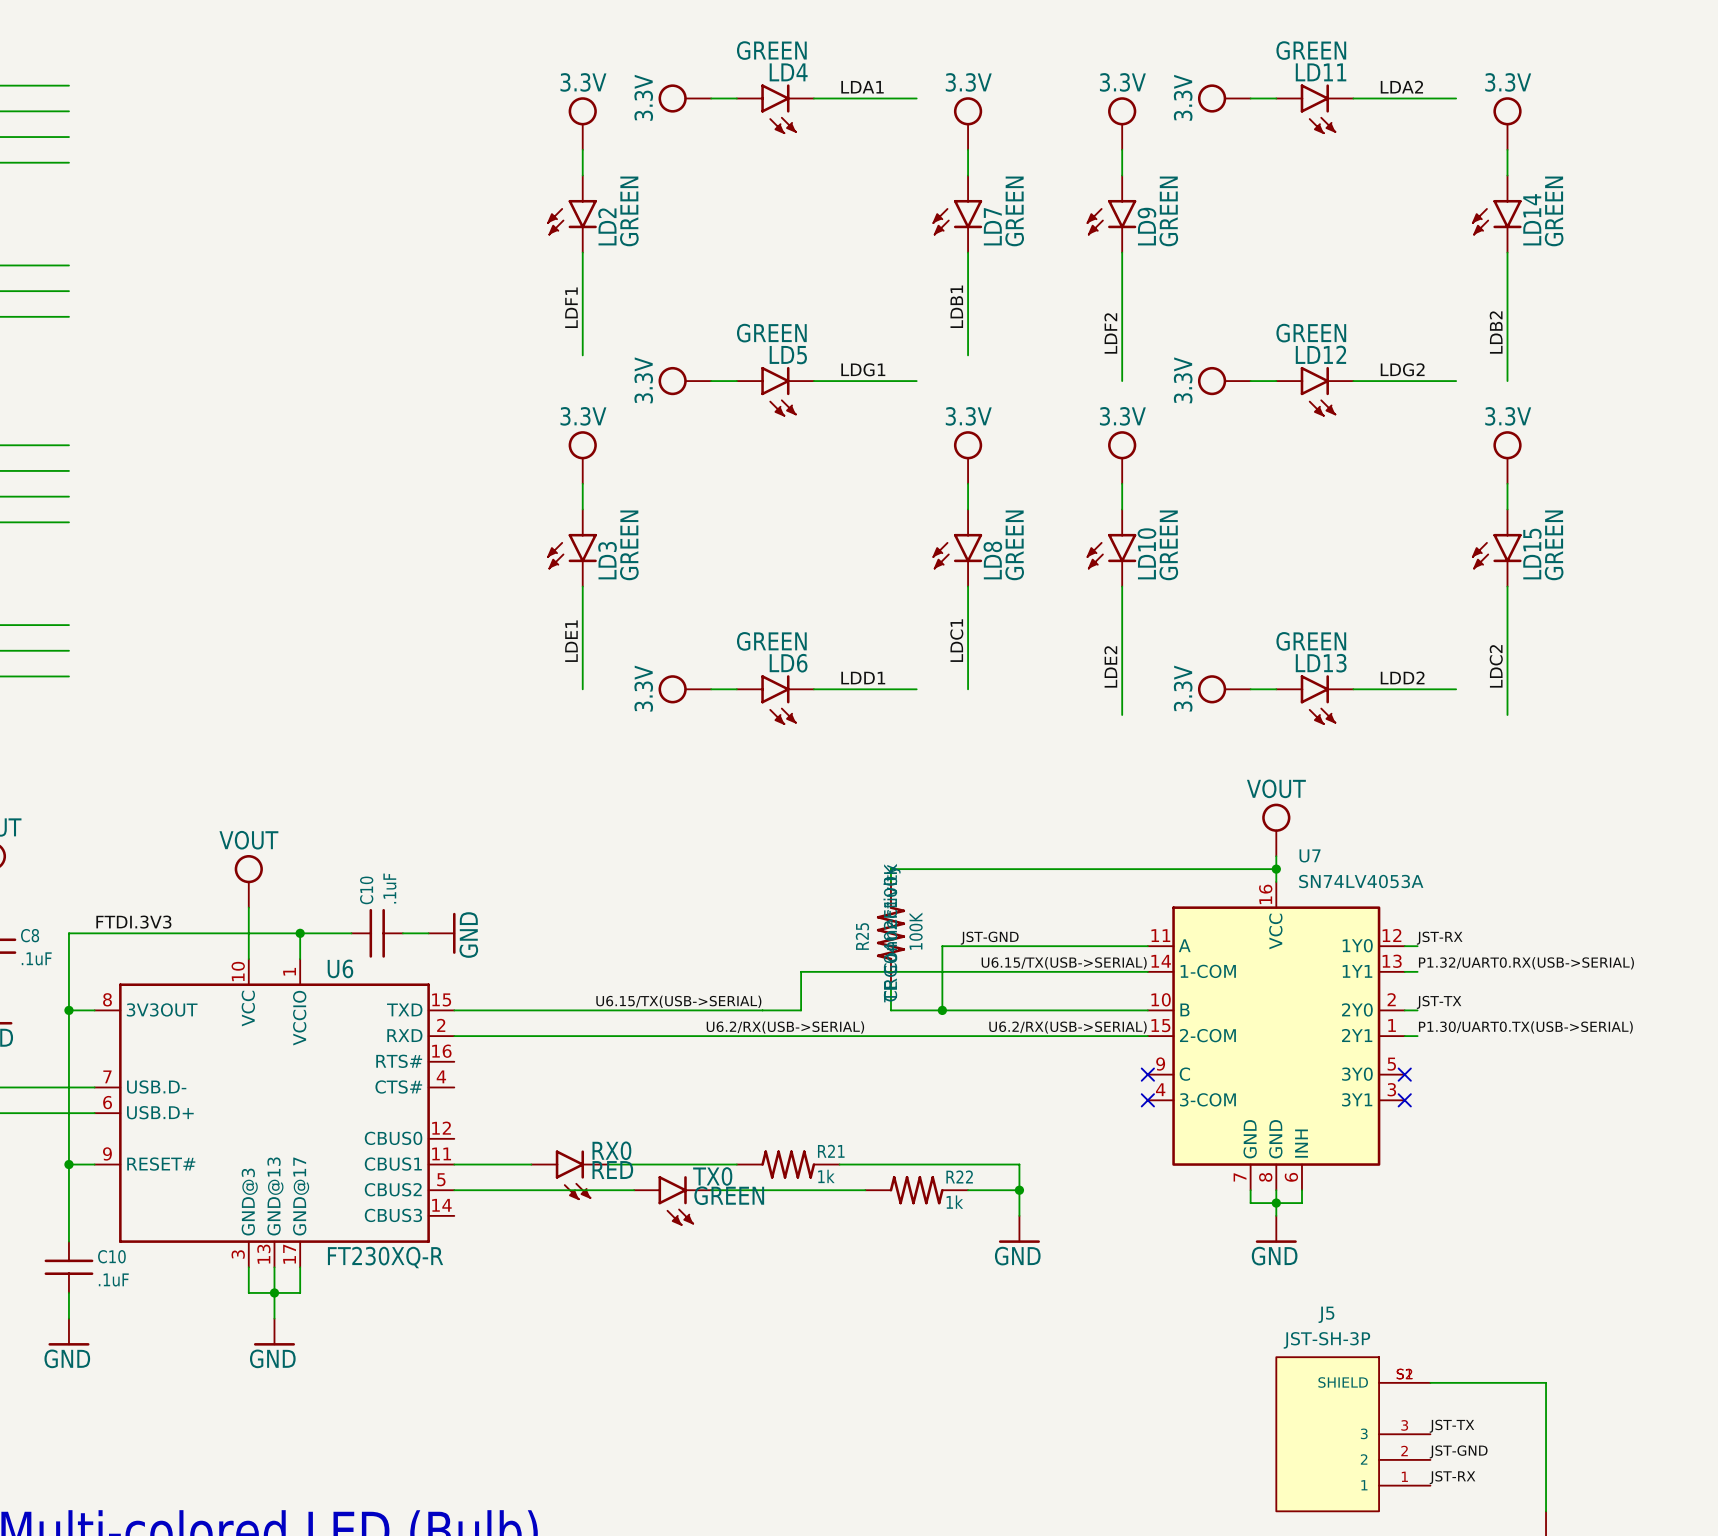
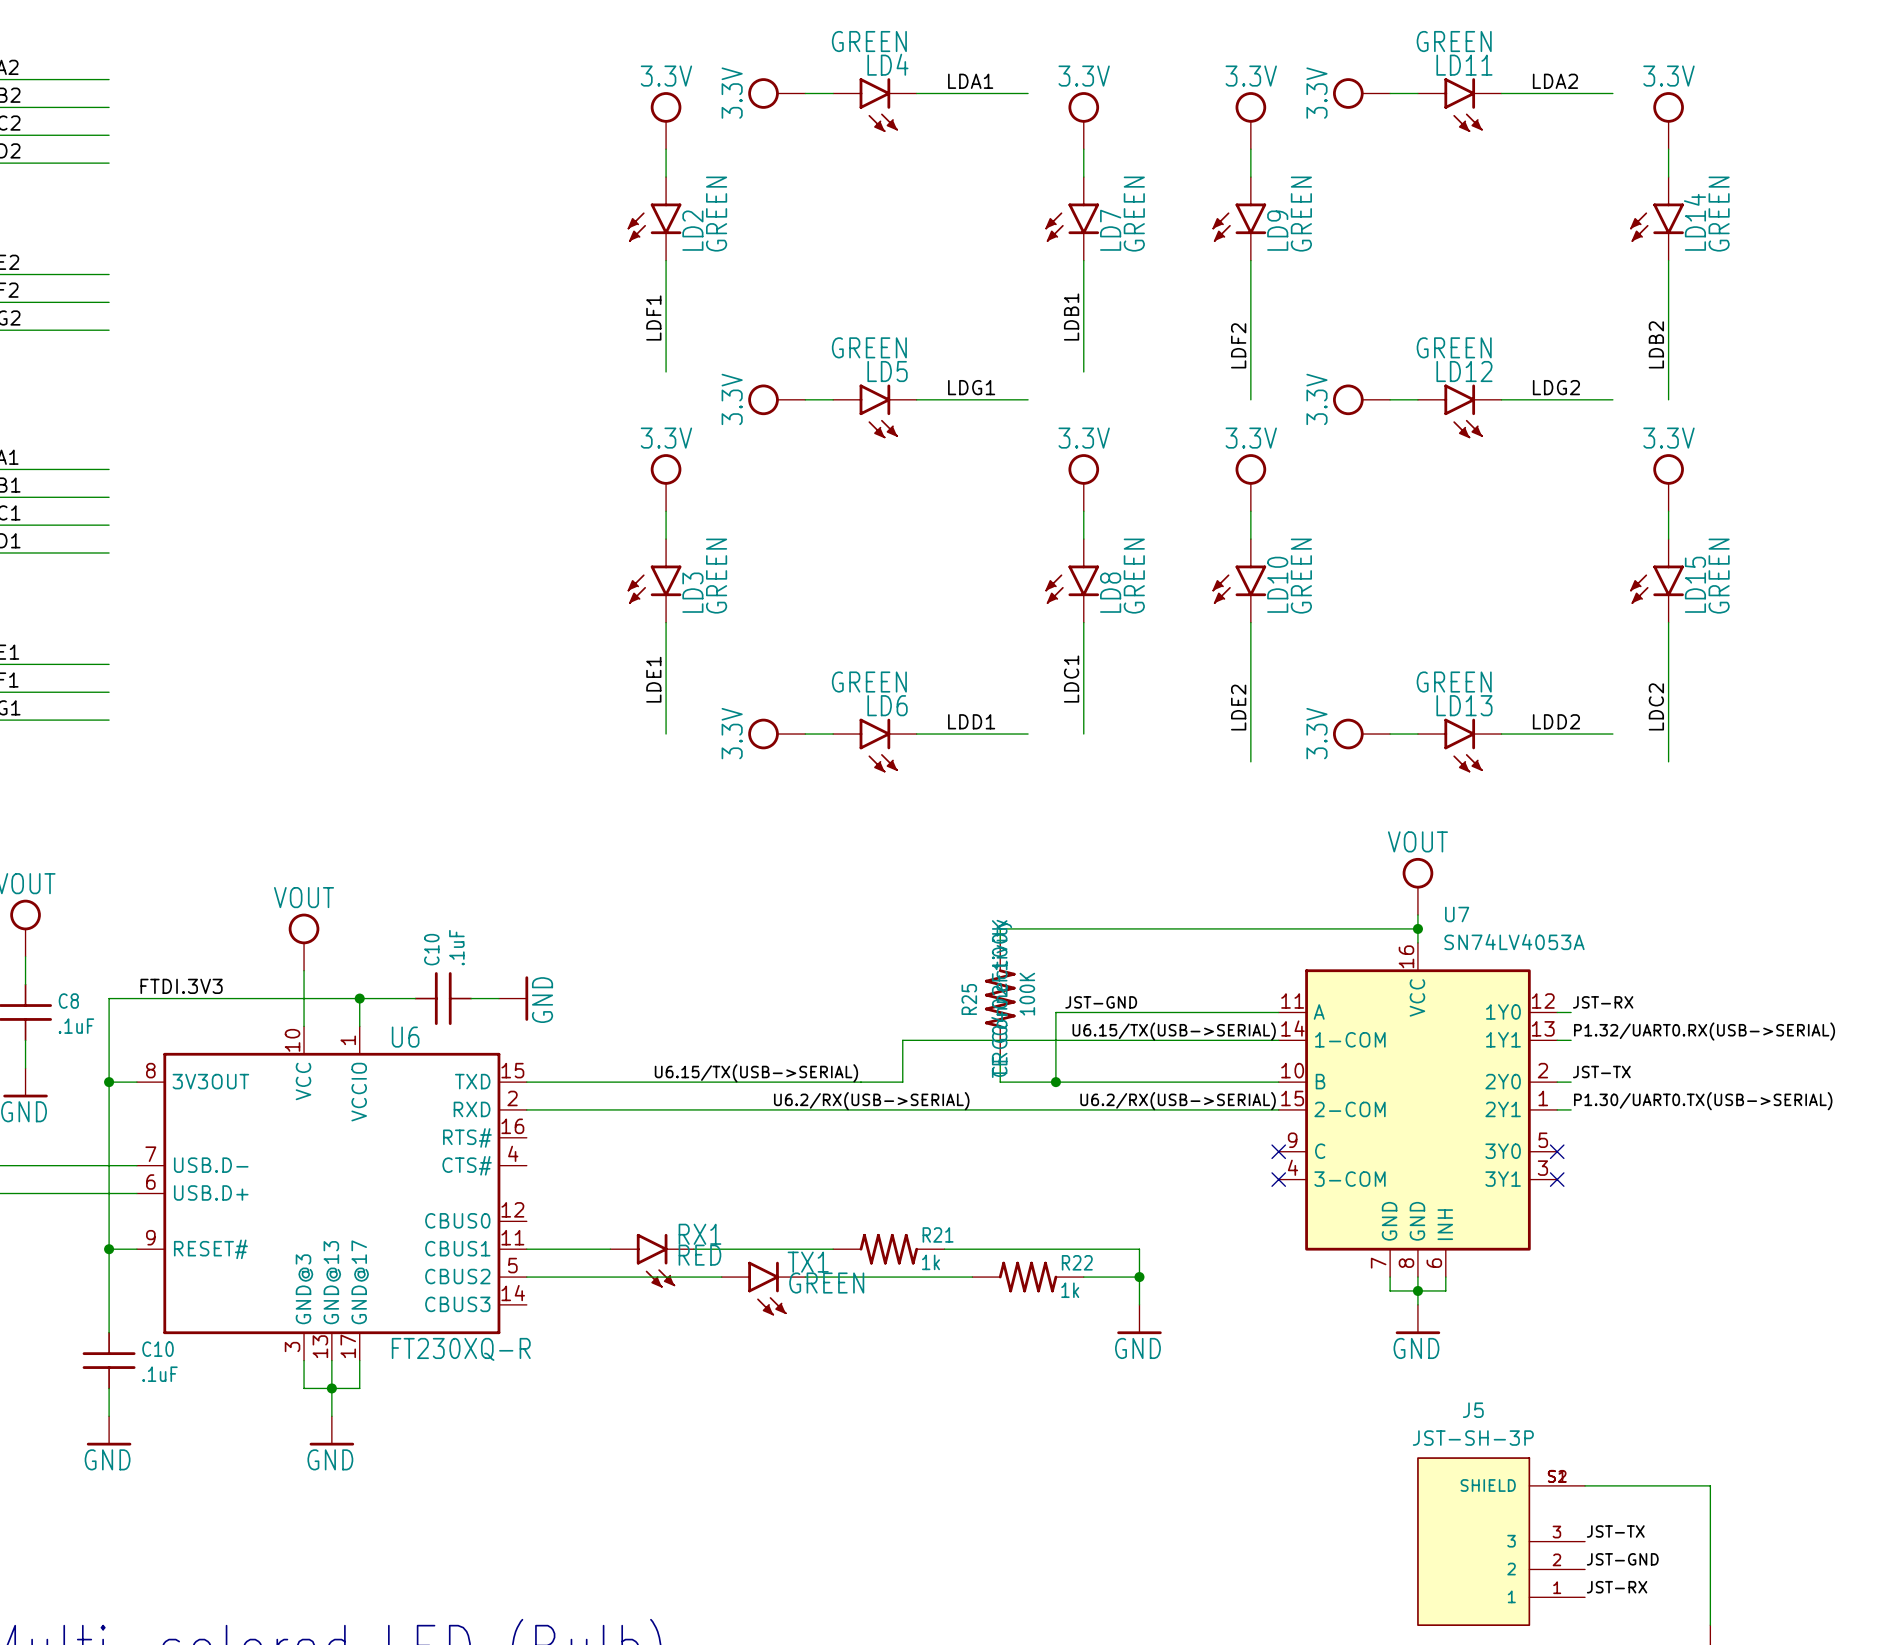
RX0 name: RX0 (611, 1150) -> RX1 (699, 1234)
TX0 name: TX0 (712, 1176) -> TX1 (808, 1262)

